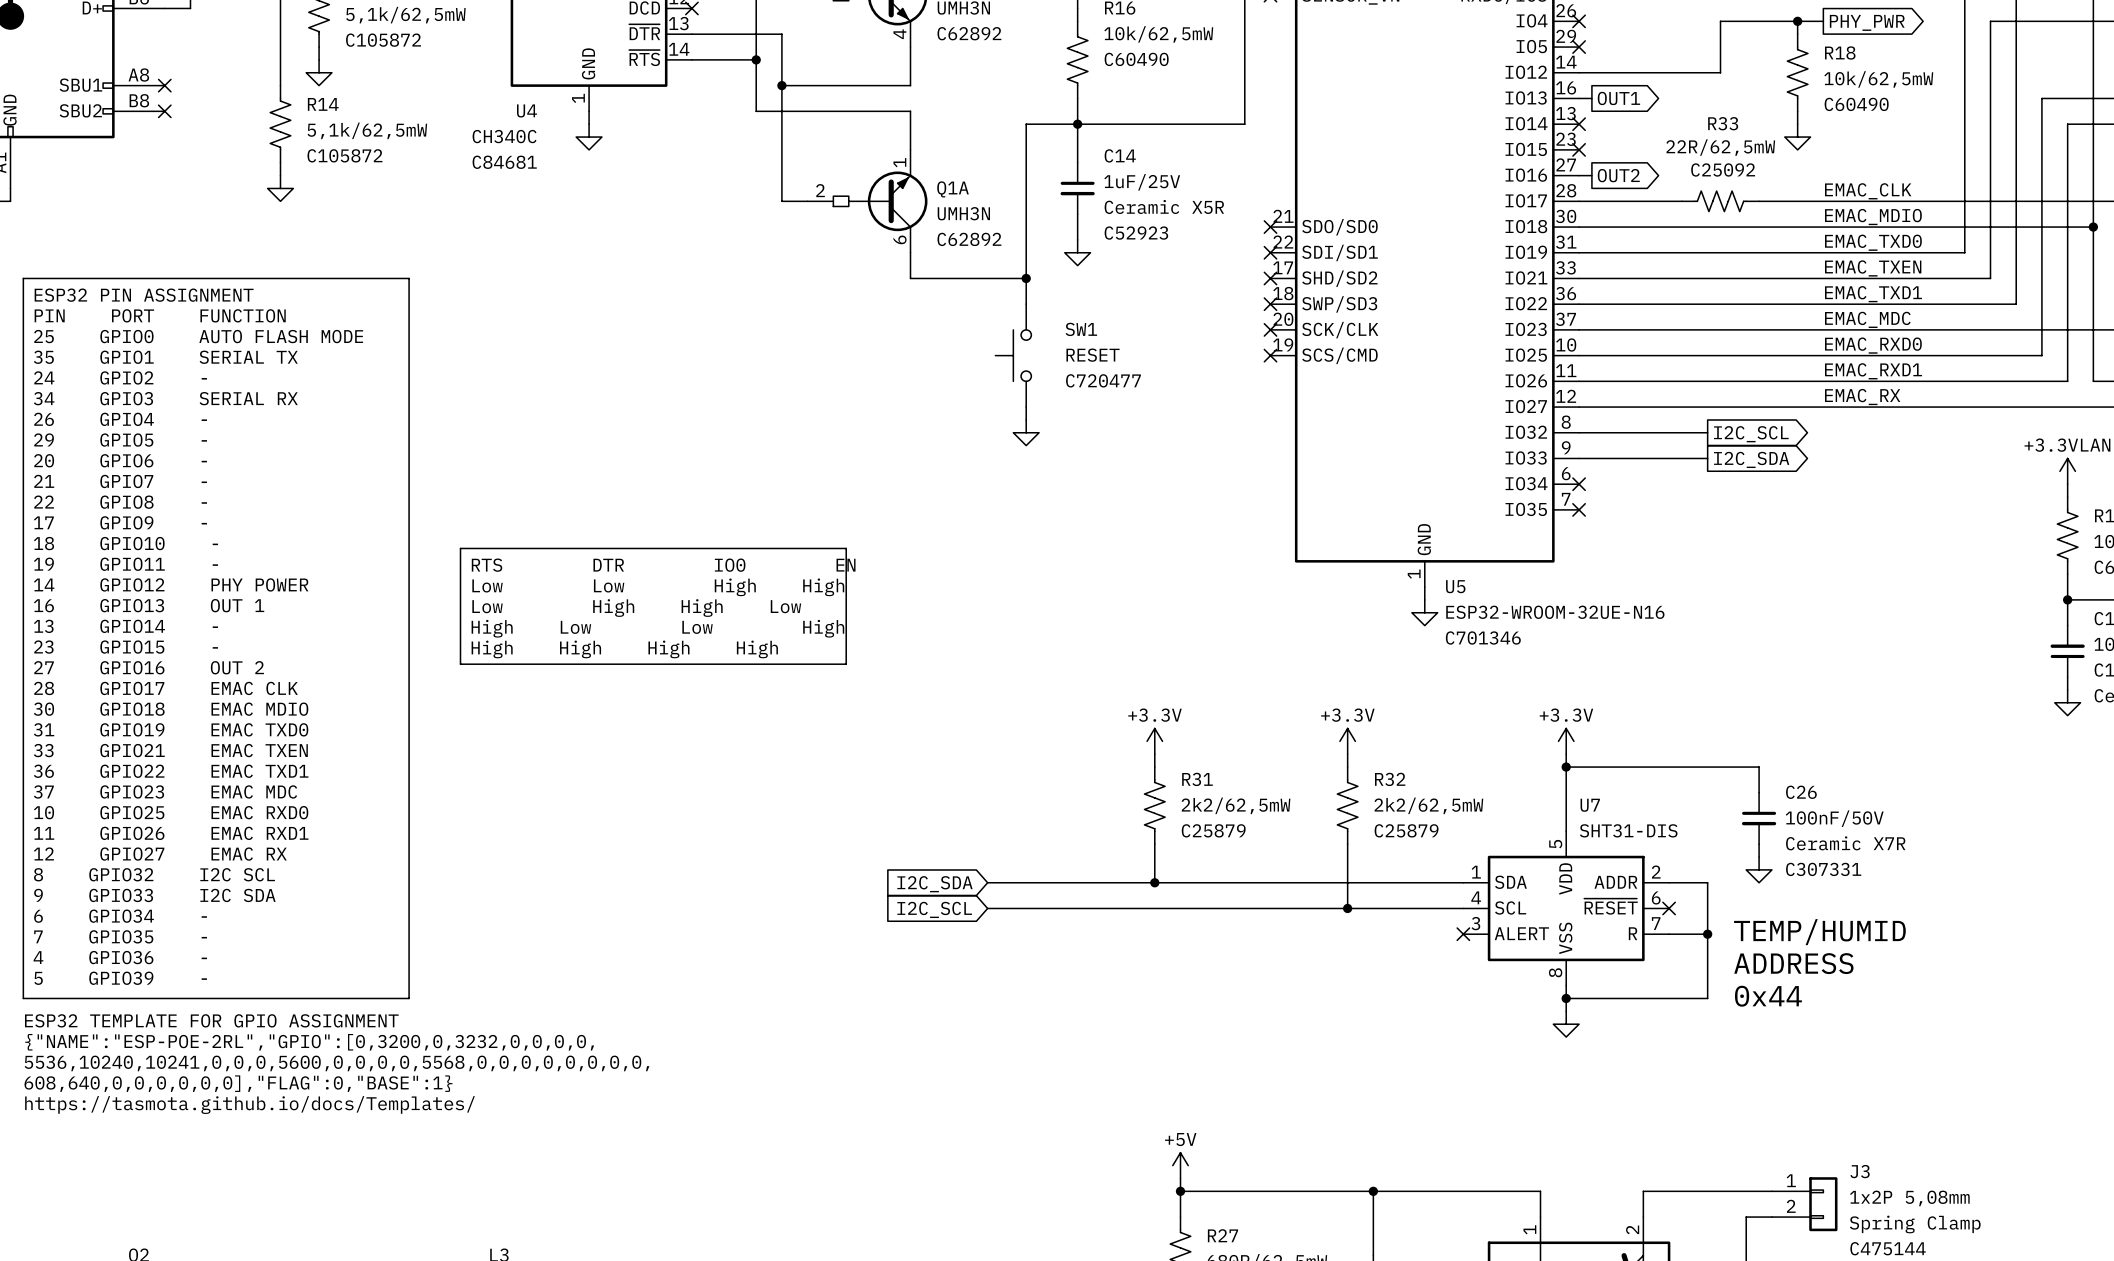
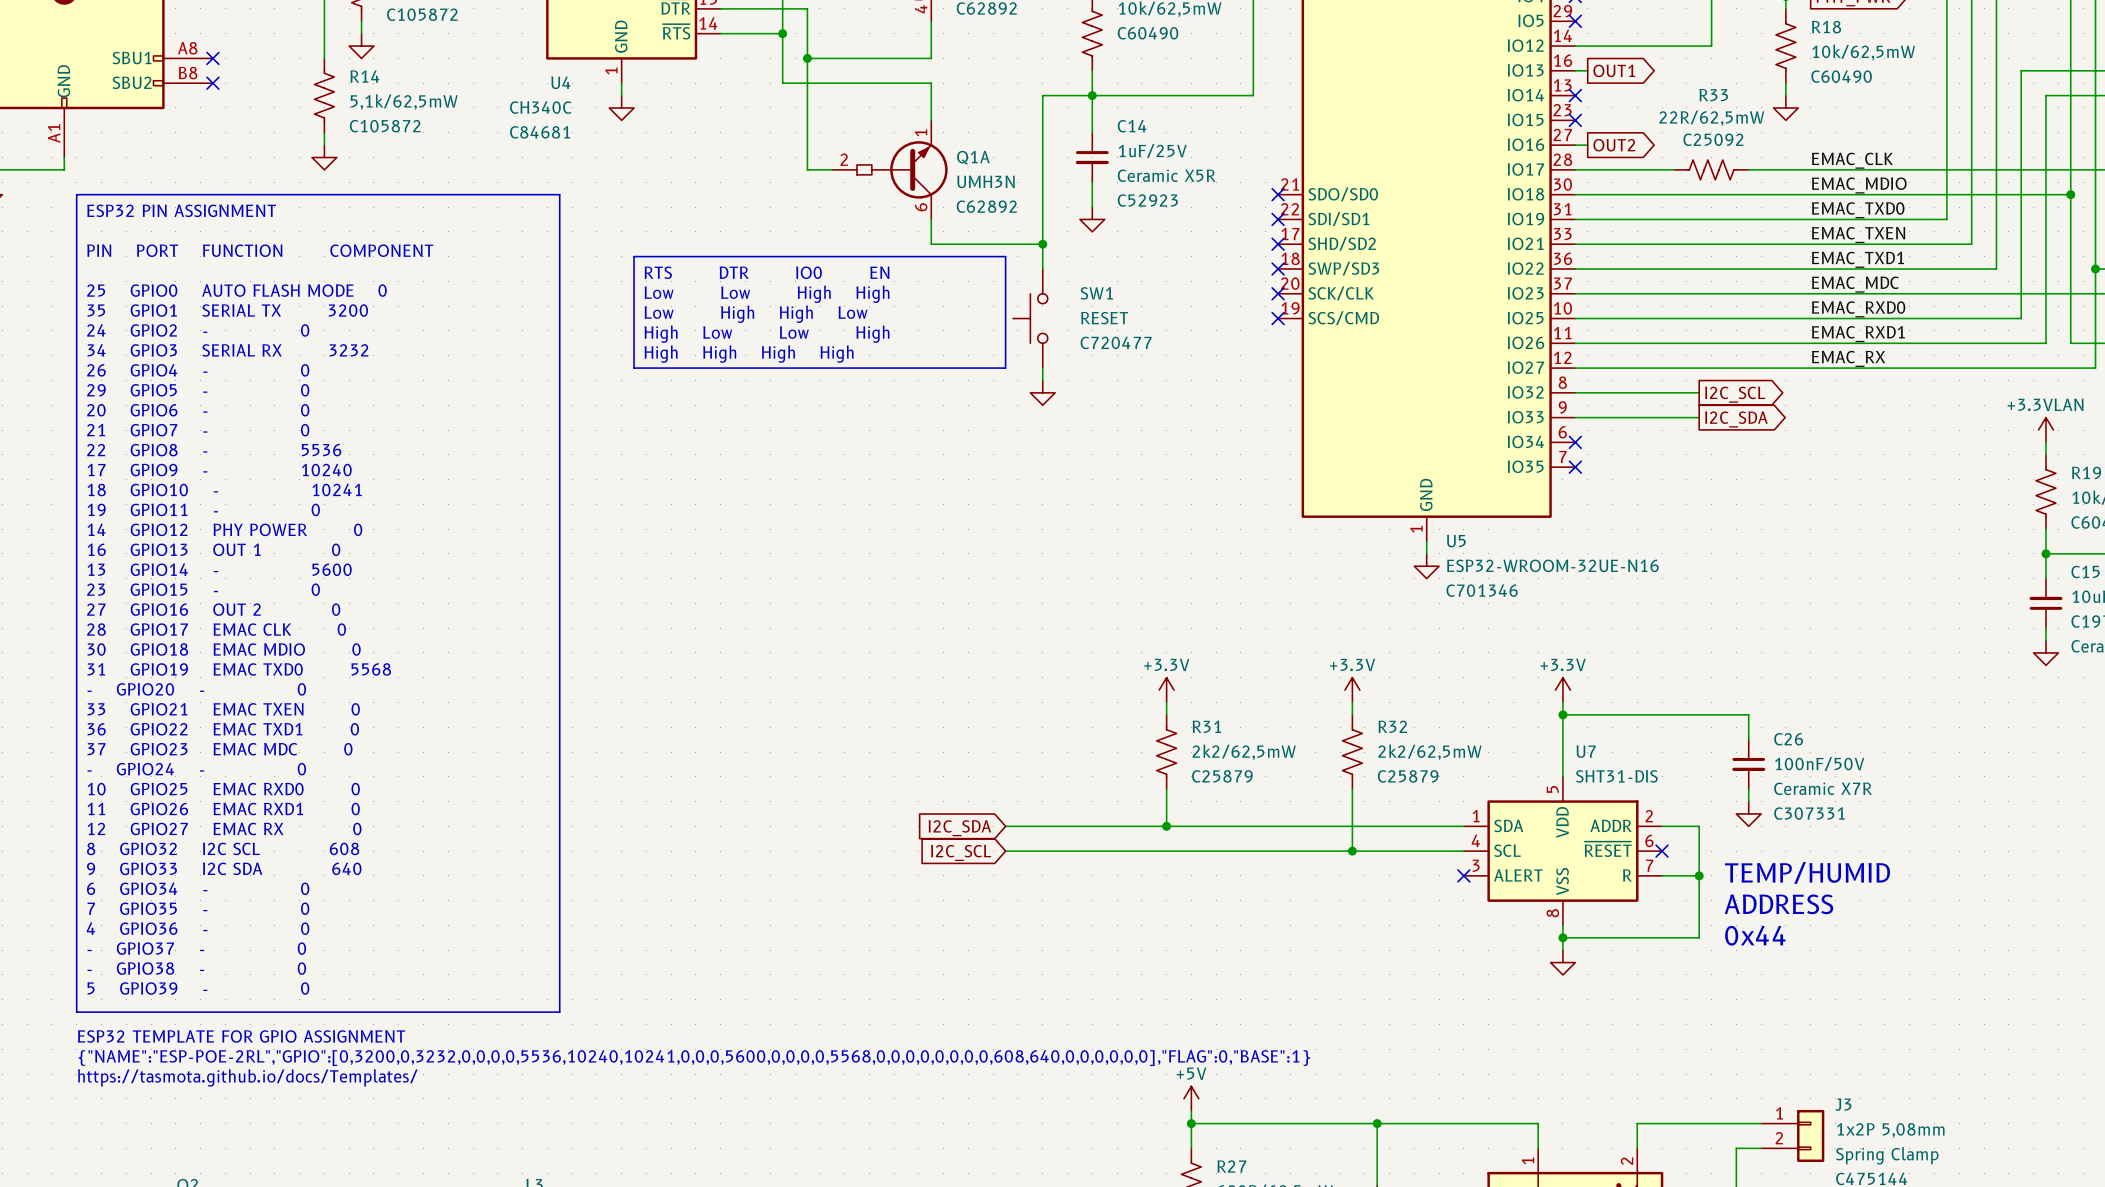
line: (23, 278) (409, 278) (409, 998) (23, 998) -> (76, 244) (76, 194) (559, 194) (559, 1012) (76, 1012) (76, 937)
text: none -> PIN PORT FUNCTION COMPONENT (260, 250)
line: none -> (634, 256) (1005, 256) (1005, 368) (634, 368) (634, 256)
text position: ESP32 PIN ASSIGNMENT (144, 295) -> ESP32 PIN ASSIGNMENT (181, 210)
text: none -> RTS DTR IO0 EN (766, 272)
text: PIN PORT FUNCTION (160, 315) -> none
text: none -> Low Low High High (767, 294)
text: 25 GPIO0 AUTO FLASH MODE (198, 336) -> 25 GPIO0 AUTO FLASH MODE 0 (236, 290)
text: none -> Low High High Low (756, 314)
text: 35 GPIO1 SERIAL TX (165, 357) -> 35 GPIO1 SERIAL TX 3200 (227, 310)
text: none -> High Low Low High (766, 334)
text: 24 GPIO2 - (120, 377) -> 24 GPIO2 - 0 (198, 330)
text: none -> High High High High (749, 354)
text: 34 GPIO3 SERIAL RX (165, 398) -> 34 GPIO3 SERIAL RX 3232 (227, 350)
text: 26 GPIO4 - (120, 419) -> 26 GPIO4 - 0 (198, 370)
text: 29 GPIO5 - (120, 440) -> 29 GPIO5 - 0 (198, 390)
text: 20 GPIO6 - (120, 460) -> 20 GPIO6 - 0 (198, 410)
text: 21 GPIO7 - (120, 481) -> 21 GPIO7 - 0 (198, 430)
text: 22 GPIO8 - (120, 502) -> 22 GPIO8 - 5536 (214, 450)
text: 17 GPIO9 - (120, 522) -> 17 GPIO9 - 10240 (219, 470)
text: 18 GPIO10 - (126, 543) -> 18 GPIO10 - 10241 (224, 489)
line: (460, 548) (846, 548) (846, 664) (460, 664) (460, 548) -> none
text: 19 GPIO11 - (126, 564) -> 19 GPIO11 - 0 (203, 509)
text: RTS DTR IO0 EN (663, 565) -> none
text: 14 GPIO12 PHY POWER (171, 584) -> 14 GPIO12 PHY POWER 0 (224, 529)
text: Low Low High High (658, 587) -> none
text: 16 GPIO13 OUT 1 (149, 605) -> 16 GPIO13 OUT 1 0 (213, 549)
text: Low High High Low (636, 608) -> none
text: 13 GPIO14 - (126, 626) -> 13 GPIO14 - 5600 (219, 569)
text: High Low Low High (657, 628) -> none
text: 23 GPIO15 - (126, 647) -> 23 GPIO15 - 0 (203, 589)
text: High High High High (624, 649) -> none
text: 27 GPIO16 OUT 2 (149, 667) -> 27 GPIO16 OUT 2 0 (213, 609)
text: none -> 28 GPIO17 EMAC CLK 0 (216, 629)
text: 28 GPIO17 EMAC CLK (166, 688) -> none
text: none -> 30 GPIO18 EMAC MDIO 0 (224, 649)
text: 30 GPIO18 EMAC MDIO (171, 709) -> none
text: none -> 31 GPIO19 EMAC TXD0 5568 (239, 669)
text: 31 GPIO19 EMAC TXD0 (171, 729) -> none
text: none -> - GPIO20 - 0 (196, 689)
text: 33 GPIO21 EMAC TXEN (170, 750) -> none
text: none -> 33 GPIO21 EMAC TXEN 0 (223, 709)
text: 36 GPIO22 EMAC TXD1 (171, 771) -> none
text: none -> 36 GPIO22 EMAC TXD1 0 (223, 729)
text: 37 GPIO23 EMAC MDC (165, 791) -> none
text: none -> 37 GPIO23 EMAC MDC 0 (220, 749)
text: 10 GPIO25 EMAC RXD0 (171, 812) -> none
text: none -> - GPIO24 - 0 (196, 769)
text: 11 GPIO26 EMAC RXD1 (171, 833) -> none
text: none -> 10 GPIO25 EMAC RXD0 0 (223, 789)
text: 12 GPIO27 EMAC RX (160, 854) -> none
text: none -> 11 GPIO26 EMAC RXD1 0 (223, 809)
text: 8 GPIO32 I2C SCL (154, 874) -> none
text: none -> 12 GPIO27 EMAC RX 0 (224, 828)
text: 9 GPIO33 I2C SDA (154, 895) -> 8 GPIO32 I2C SCL 608 (223, 848)
text: 6 GPIO34 - (120, 916) -> none
text: none -> 9 GPIO33 I2C SDA 640 (224, 868)
text: 7 GPIO35 - (120, 936) -> none
text: none -> 6 GPIO34 - 0 (198, 888)
text: 4 GPIO36 - (120, 957) -> none
text: none -> 7 GPIO35 - 0 (198, 908)
text: 5 GPIO39 - (120, 978) -> none
text: none -> 4 GPIO36 - 0 (198, 928)
text: none -> - GPIO37 - 0 (196, 948)
text position: ESP32 TEMPLATE FOR GPIO ASSIGNMENT (211, 1020) -> ESP32 TEMPLATE FOR GPIO ASSIGNMENT (241, 1036)
text: none -> - GPIO38 - 0 (196, 968)
text: {"NAME":"ESP-POE-2RL","GPIO":[0,3200,0,3232,0,0,0,0, (309, 1042) -> none
text: none -> 5 GPIO39 - 0 (198, 988)
text: 5536,10240,10241,0,0,0,5600,0,0,0,0,5568,0,0,0,0,0,0,0,0, (337, 1063) -> none
text: 608,640,0,0,0,0,0,0],"FLAG":0,"BASE":1} (238, 1083) -> none
text position: https://tasmota.github.io/docs/Templates/ (250, 1105) -> https://tasmota.github.io/docs/Templates/ (247, 1077)
text: none -> {"NAME":"ESP-POE-2RL","GPIO":[0,3200,0,3232,0,0,0,0,5536,10240,10241,0,0,0,5600,0,0,0,0,5568,0,0,0,0,0,0,0,0,608,640,0,0,0,0,0,0],"FLAG":0,"BASE":1} (694, 1058)

